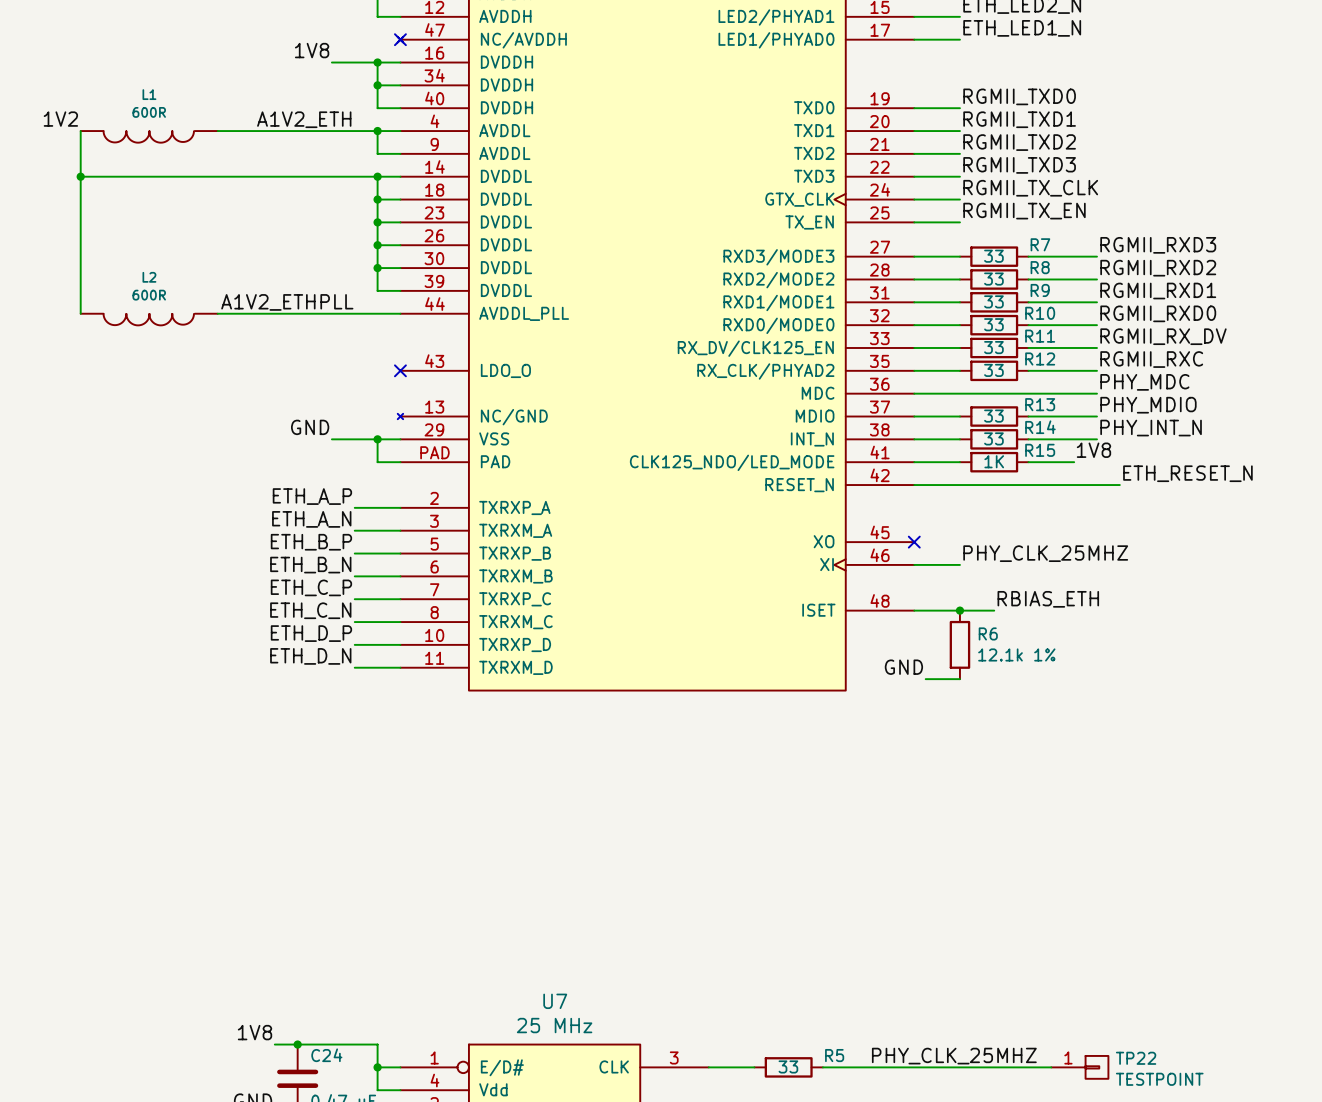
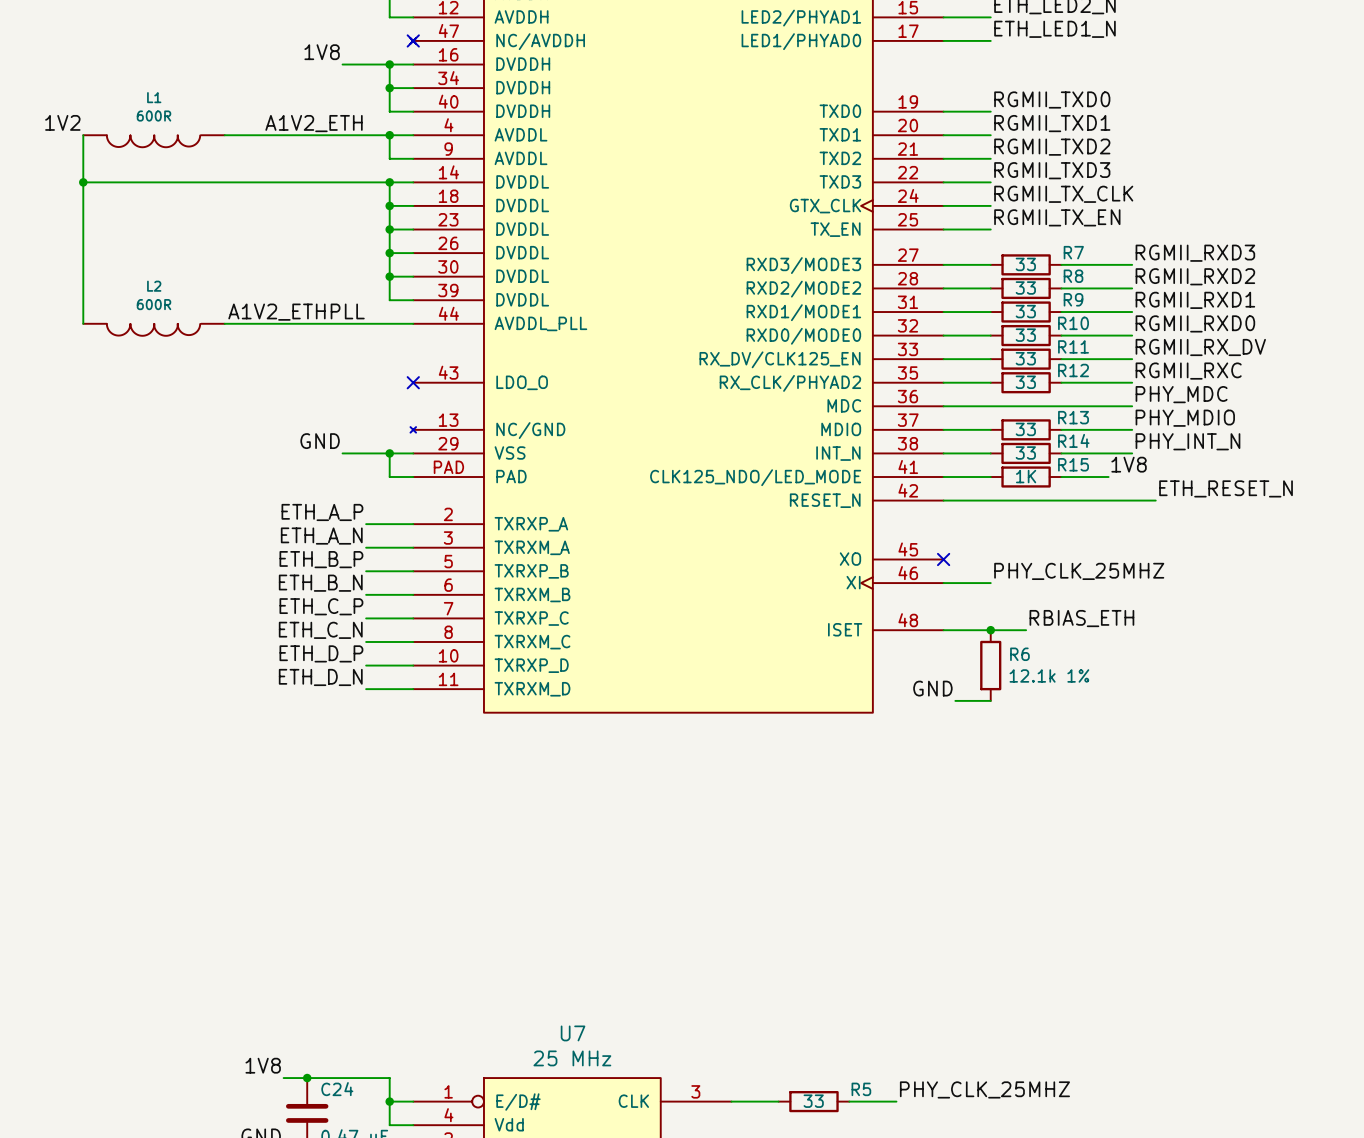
wire: (868, 1067) (1051, 1067) -> none
TP22: TESTPOINT (1079, 1067) -> none

